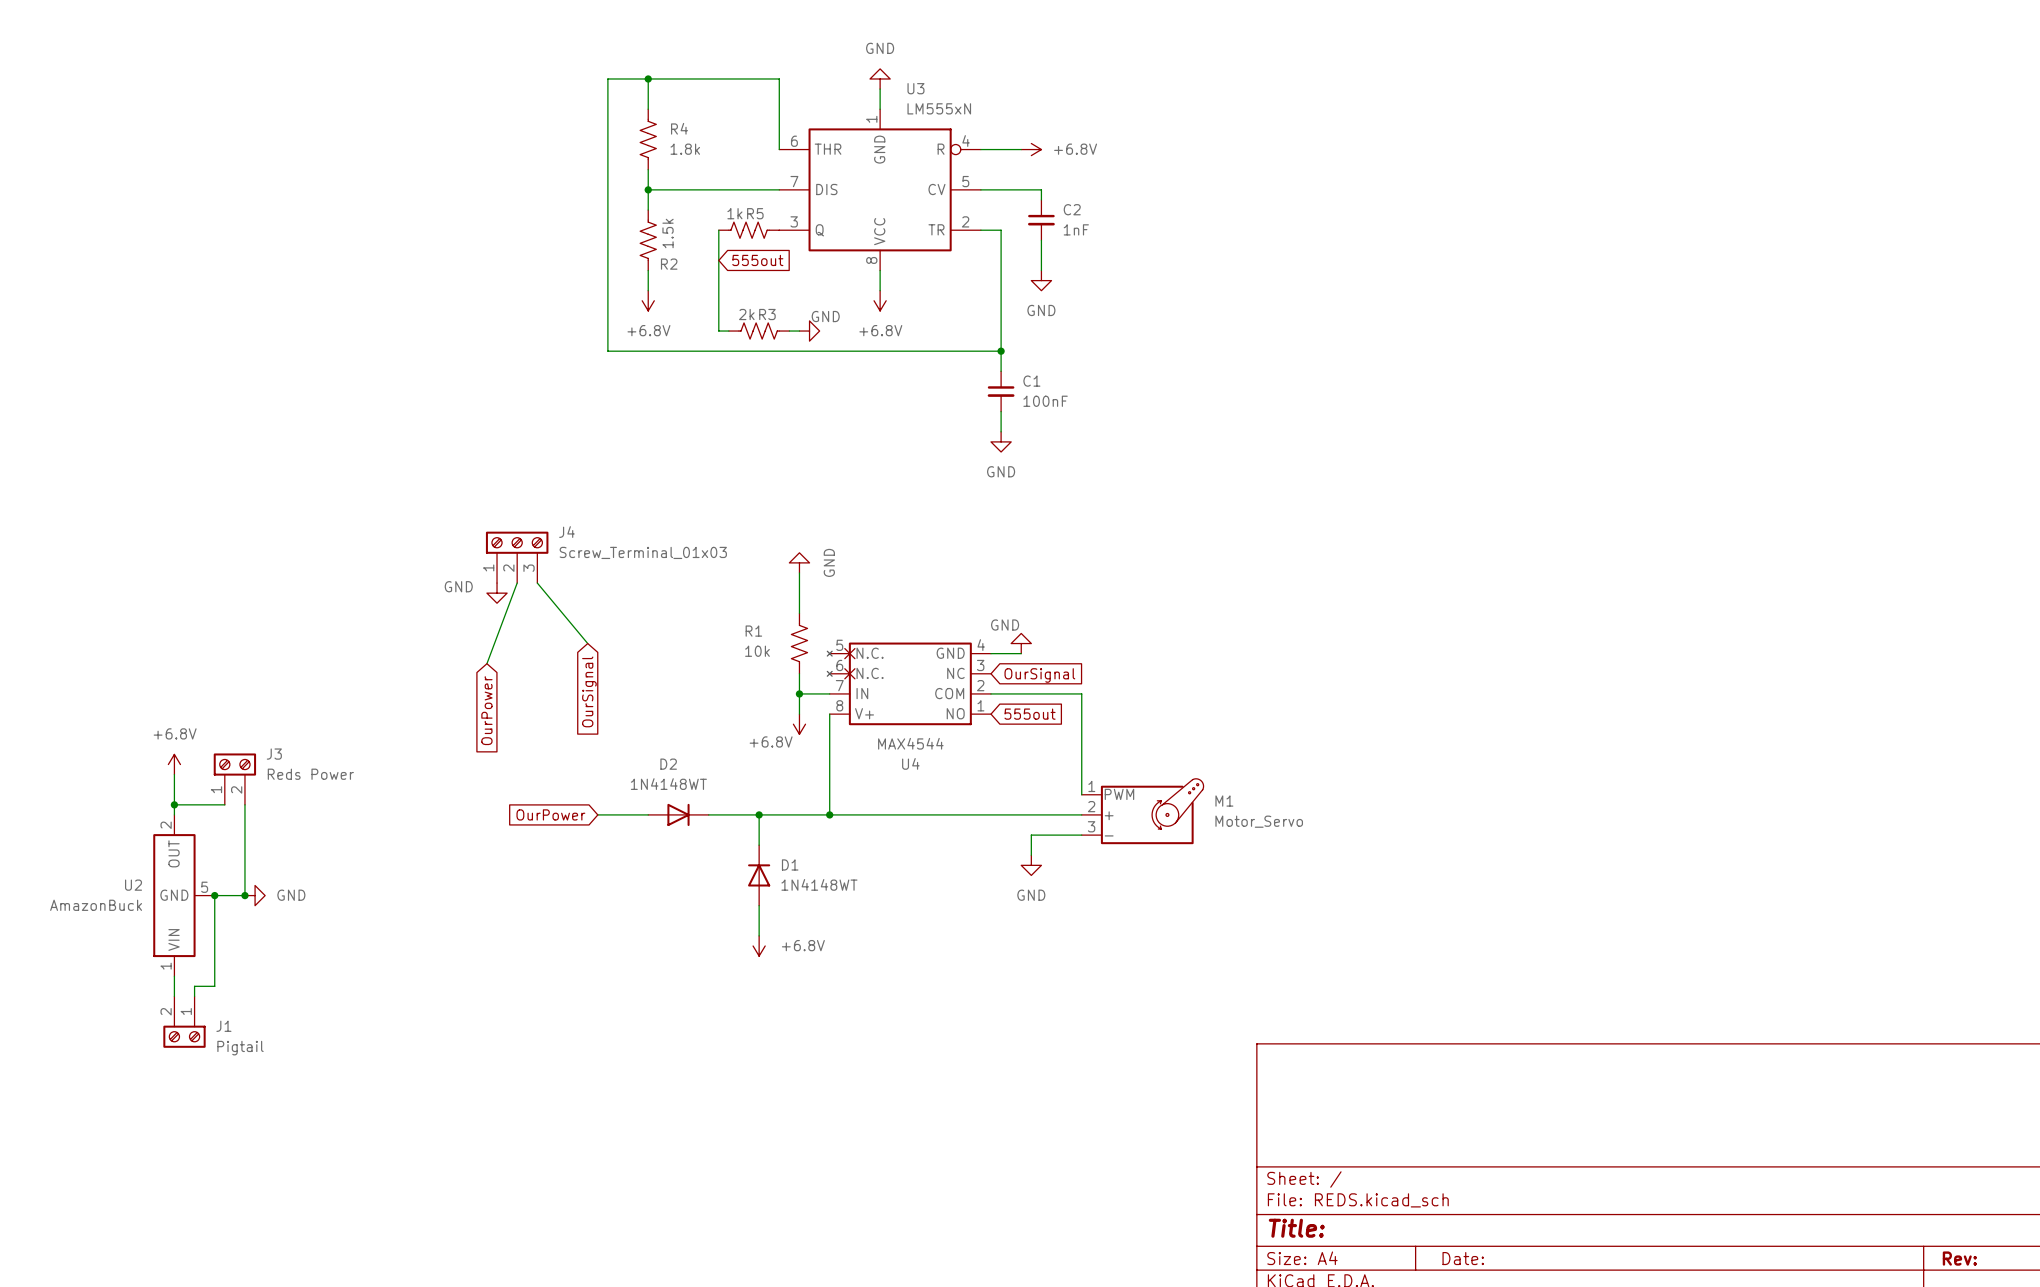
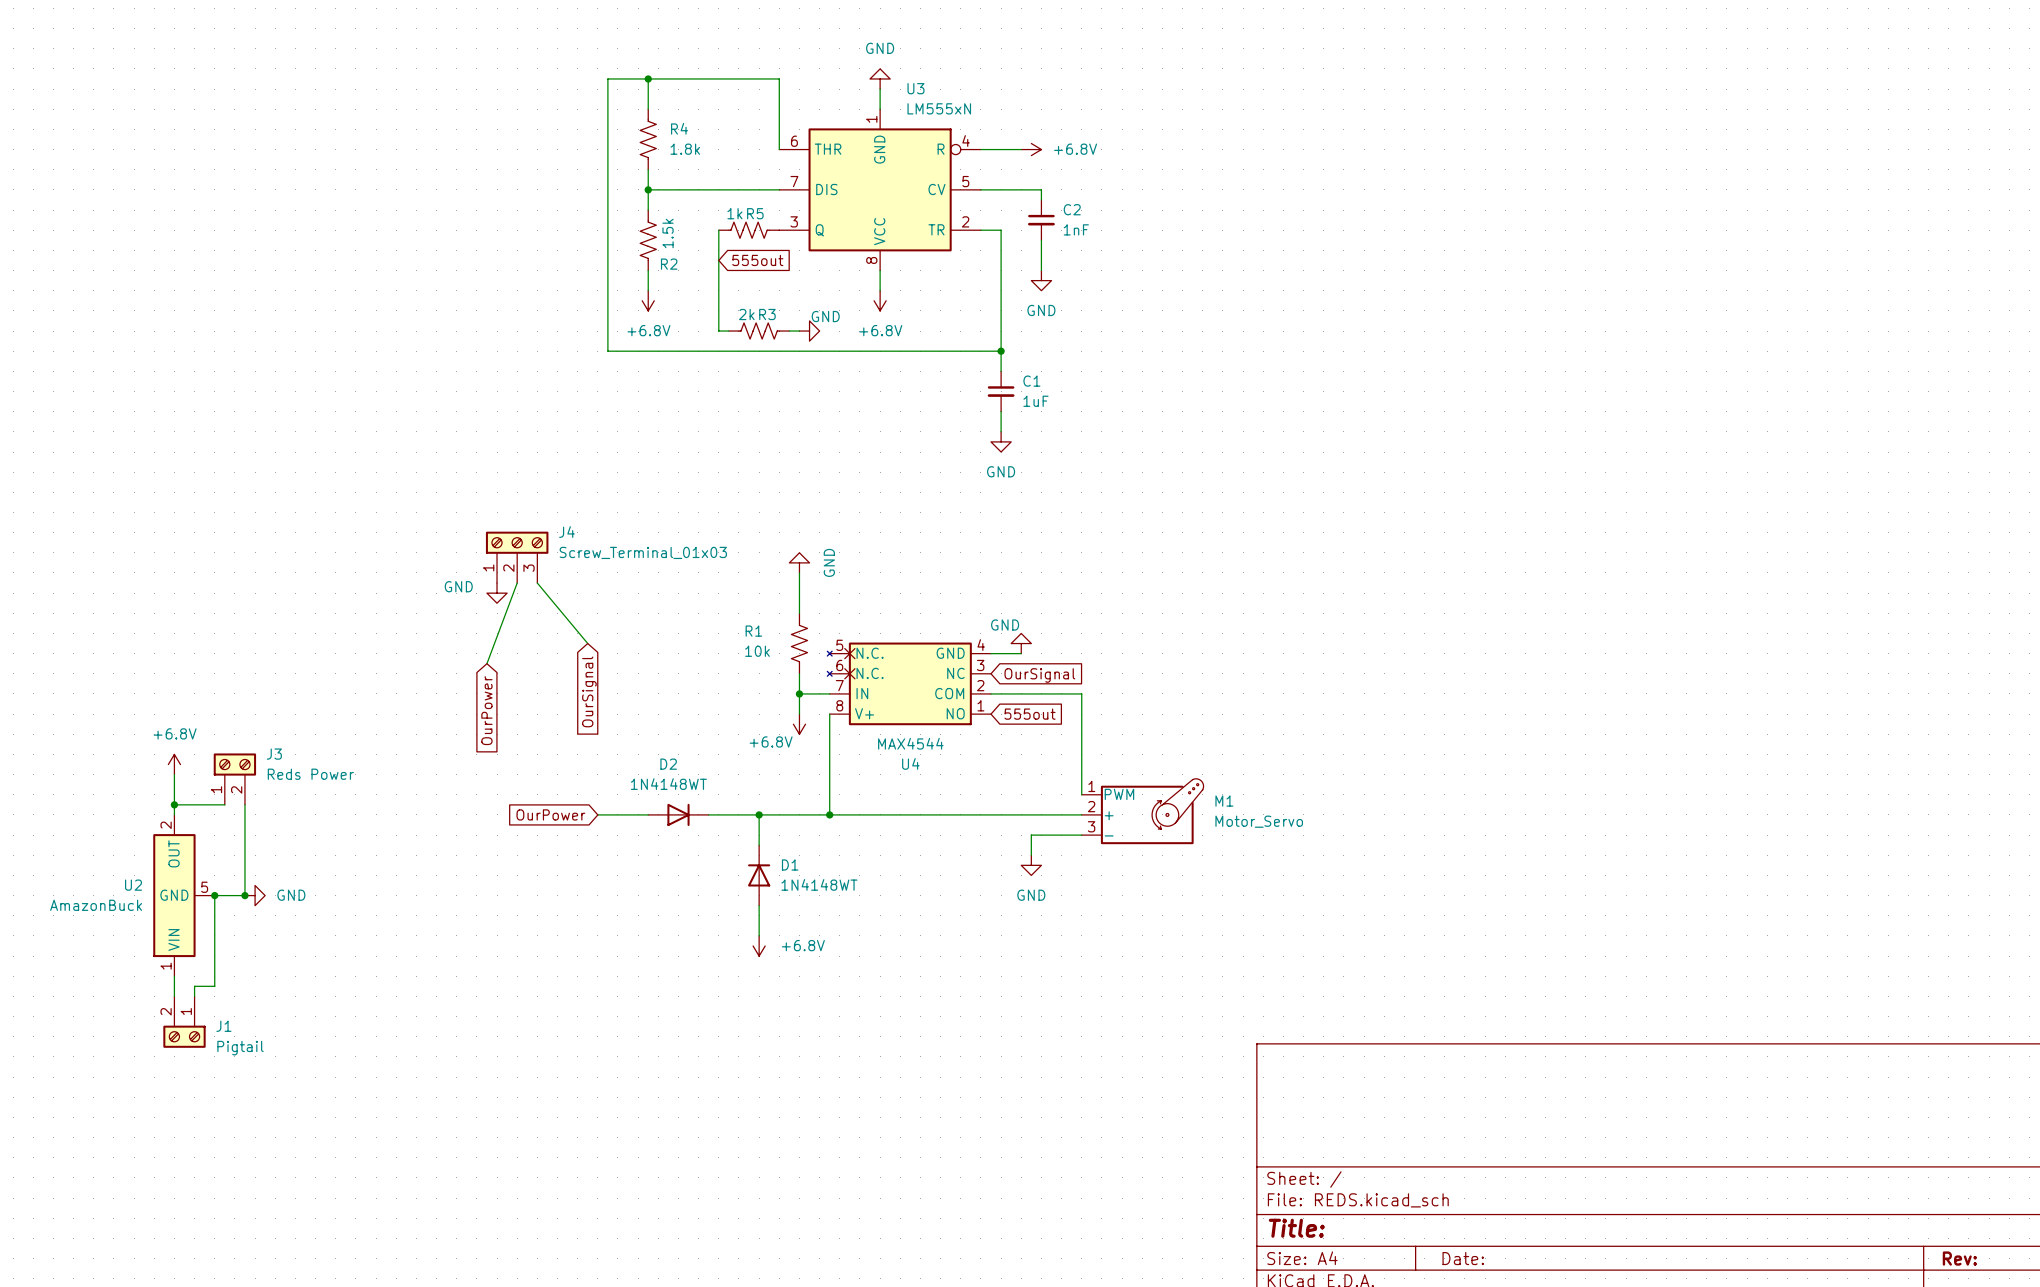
C1 value: 100nF (1045, 401) -> 1uF (1035, 401)

